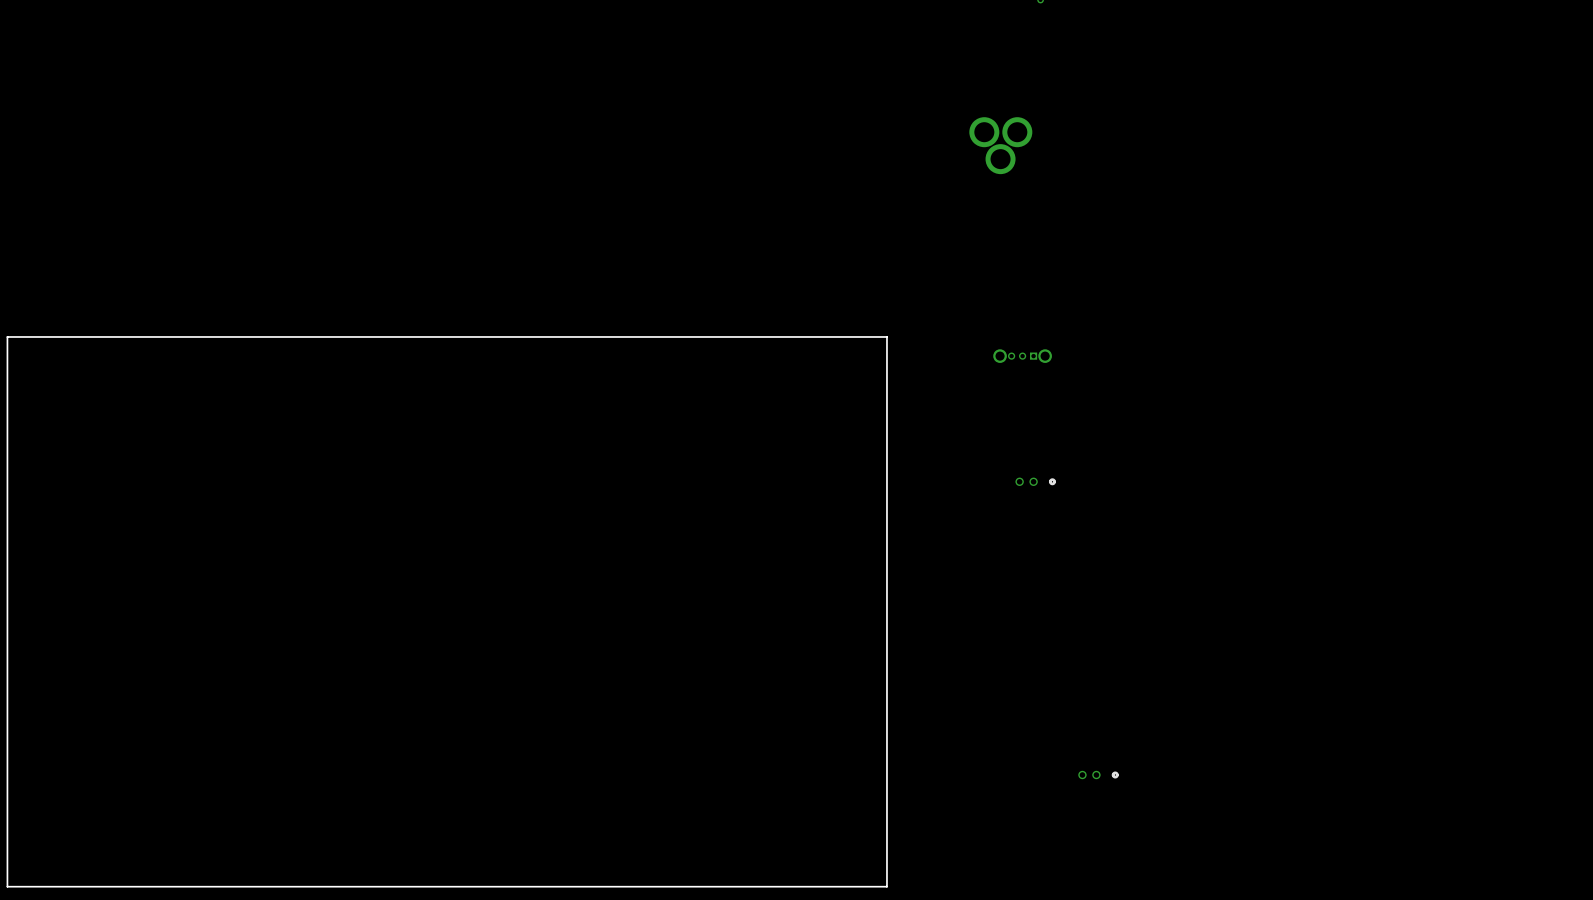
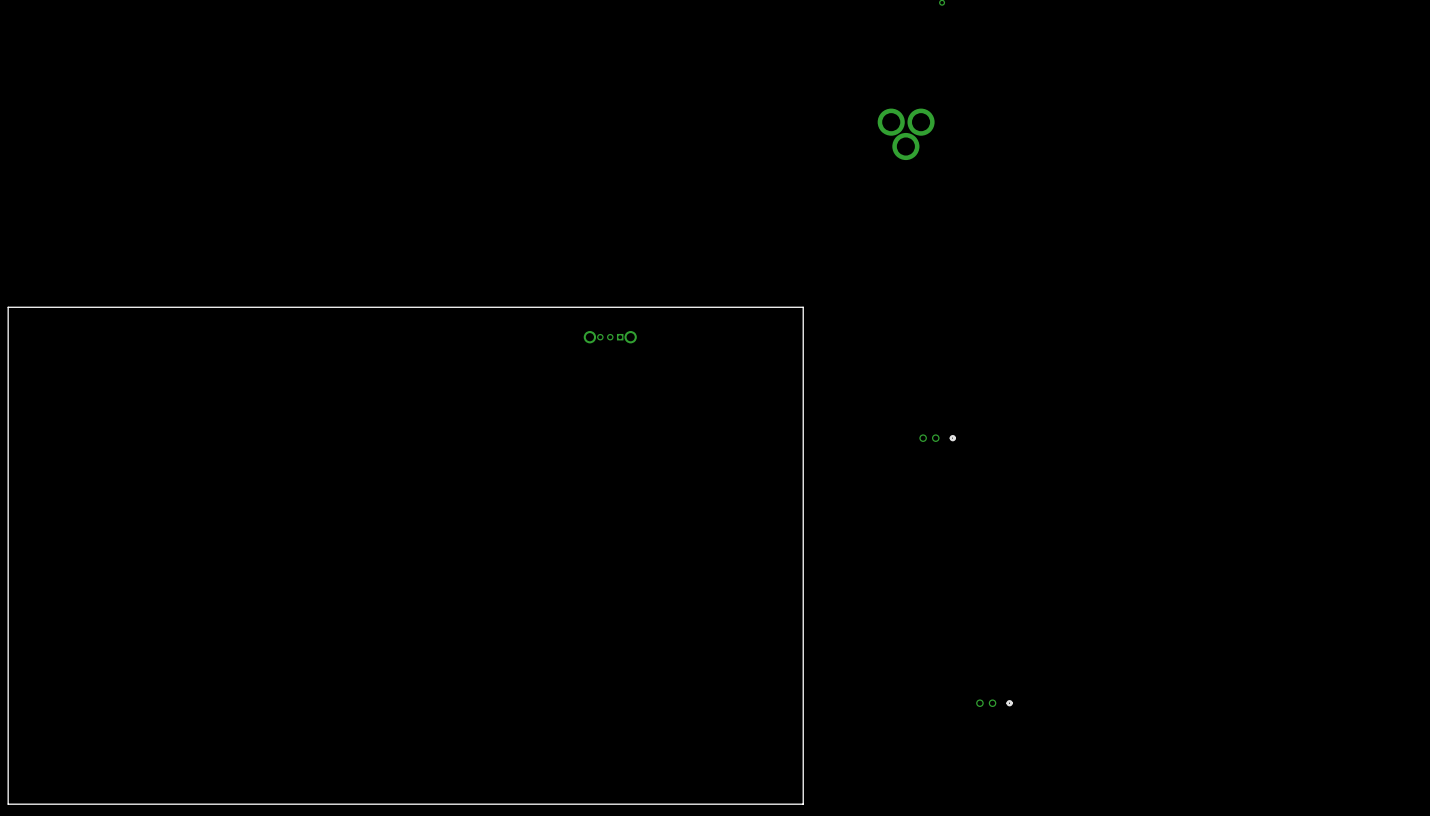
part: (1022, 356) -> none
part: none -> (610, 337)

